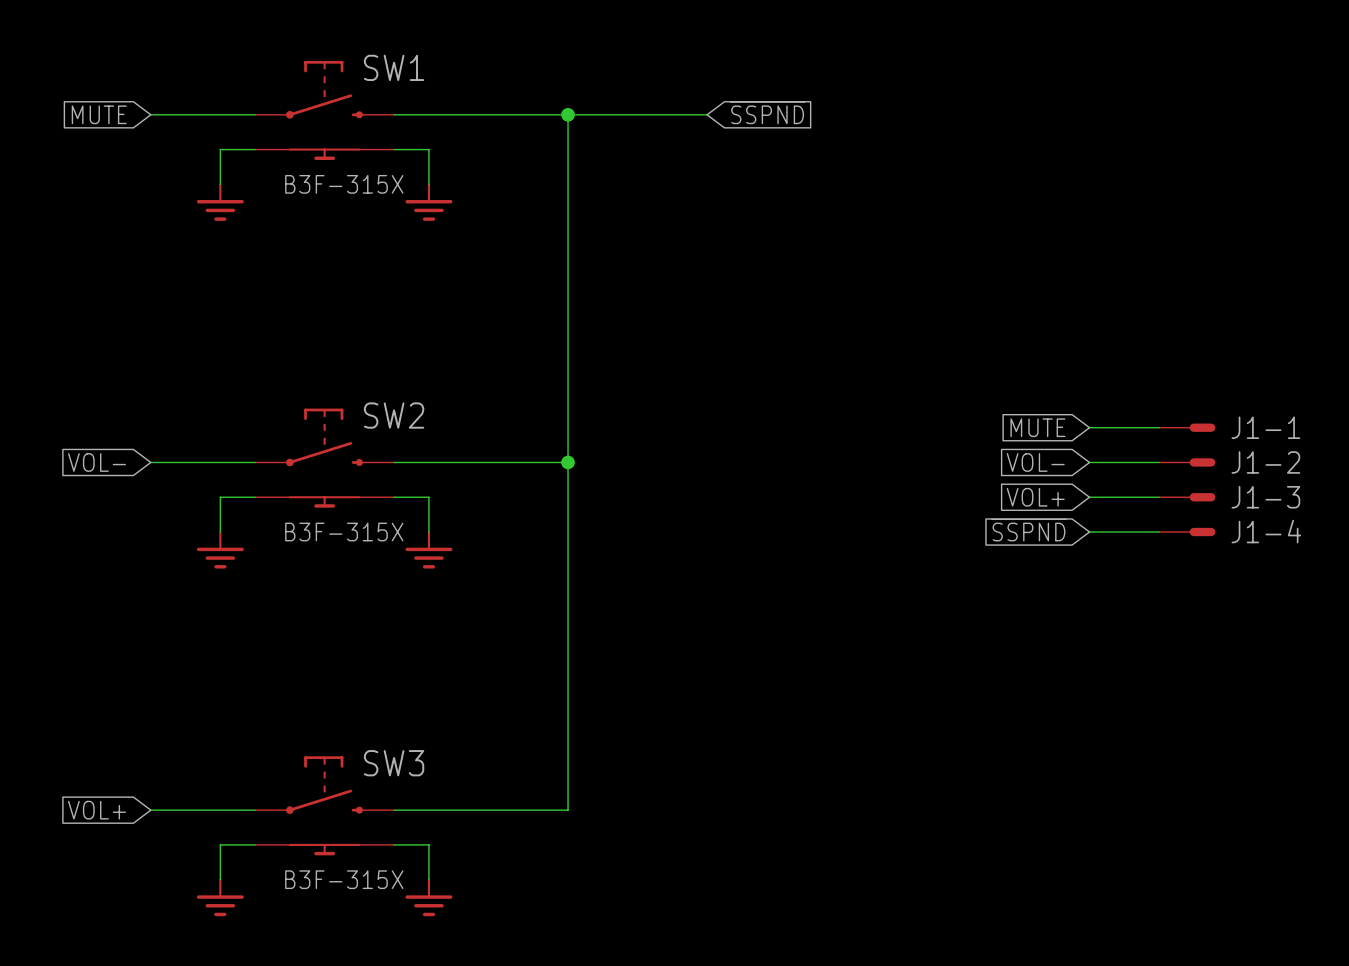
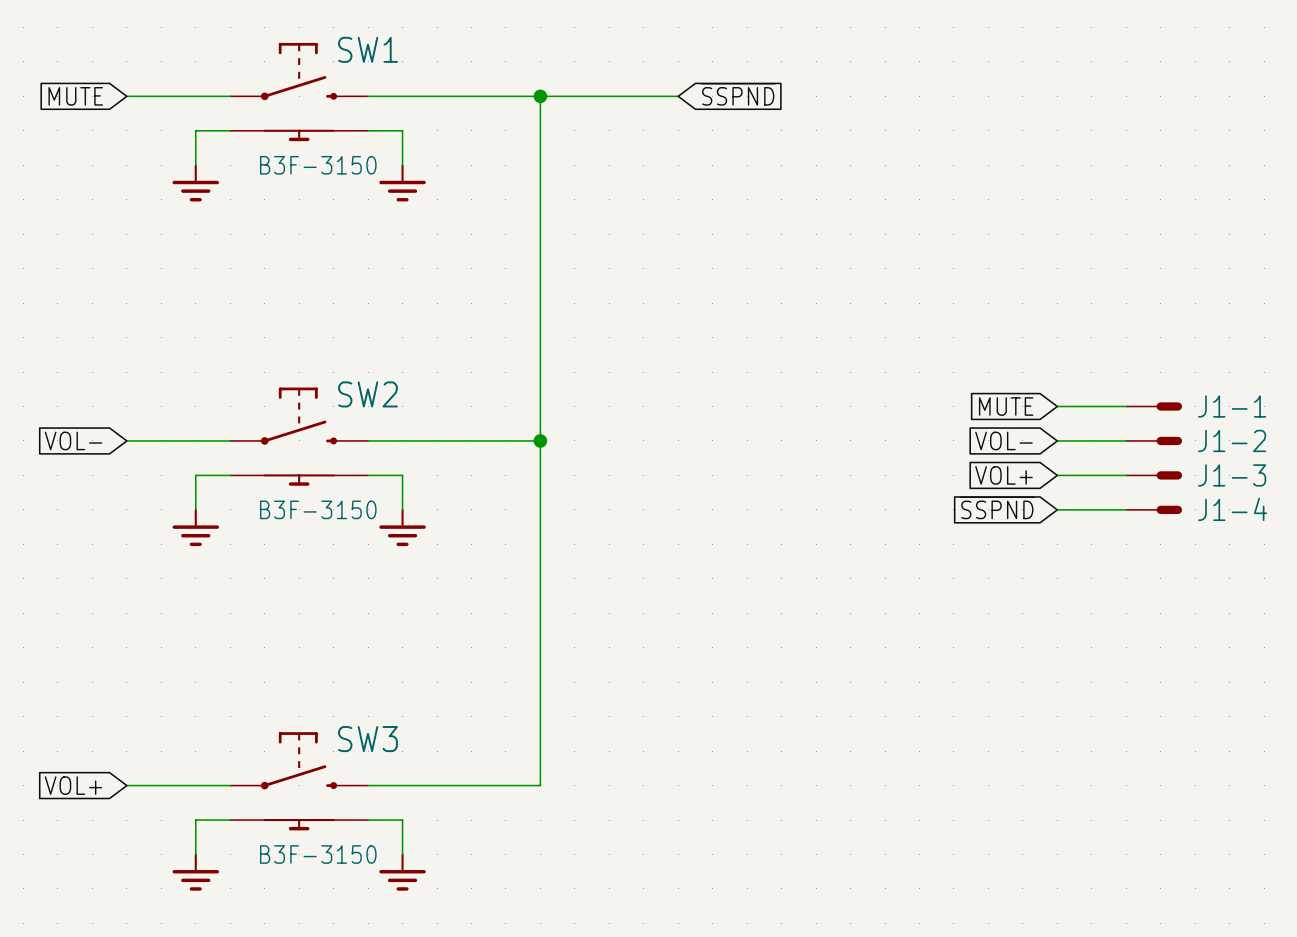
SW1 value: B3F-315X (344, 184) -> B3F-3150 (318, 165)
SW2 value: B3F-315X (344, 532) -> B3F-3150 (318, 509)
SW3 value: B3F-315X (344, 879) -> B3F-3150 (318, 854)

